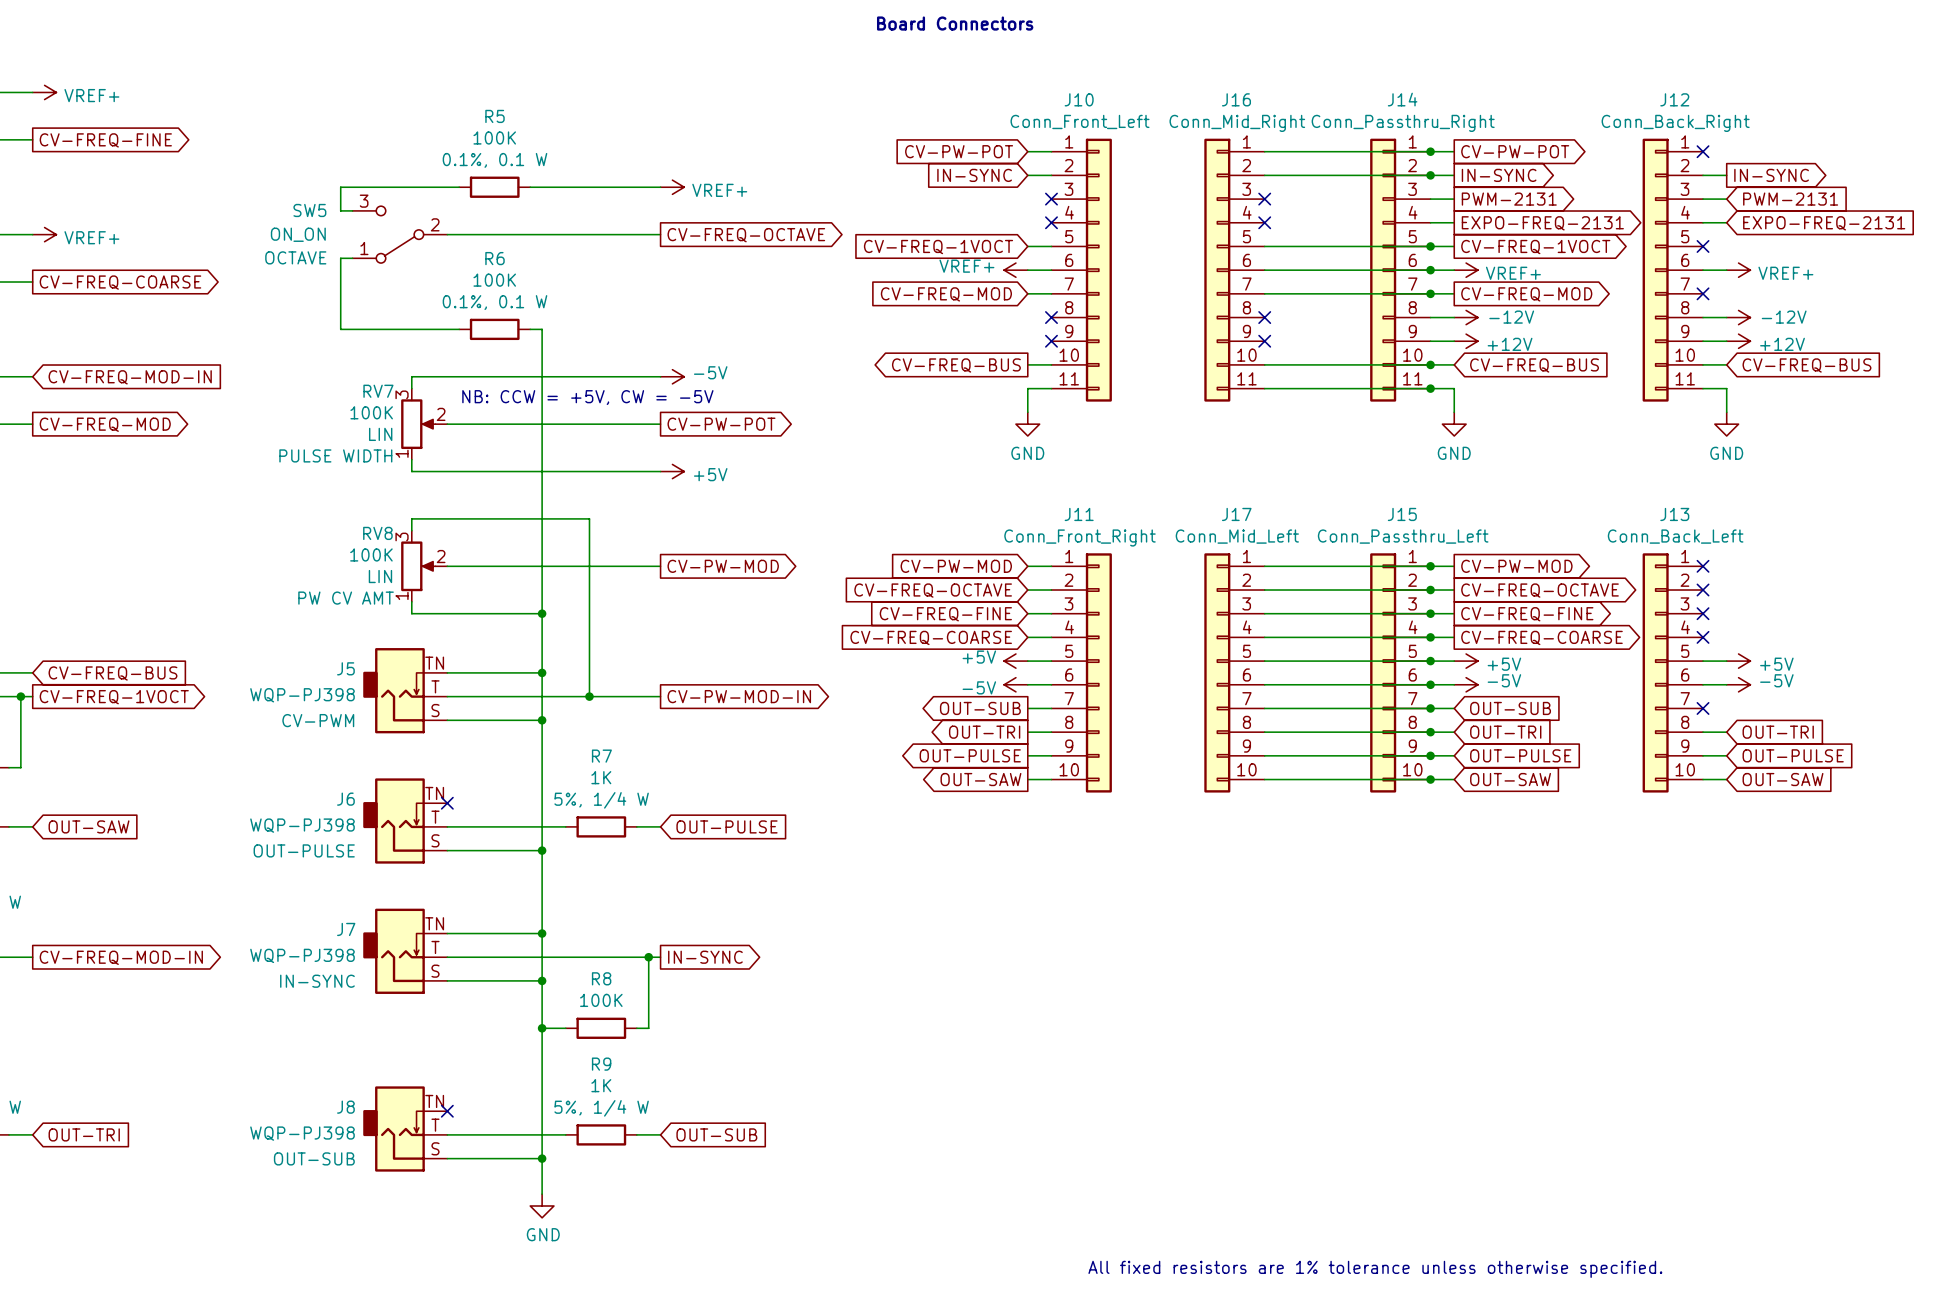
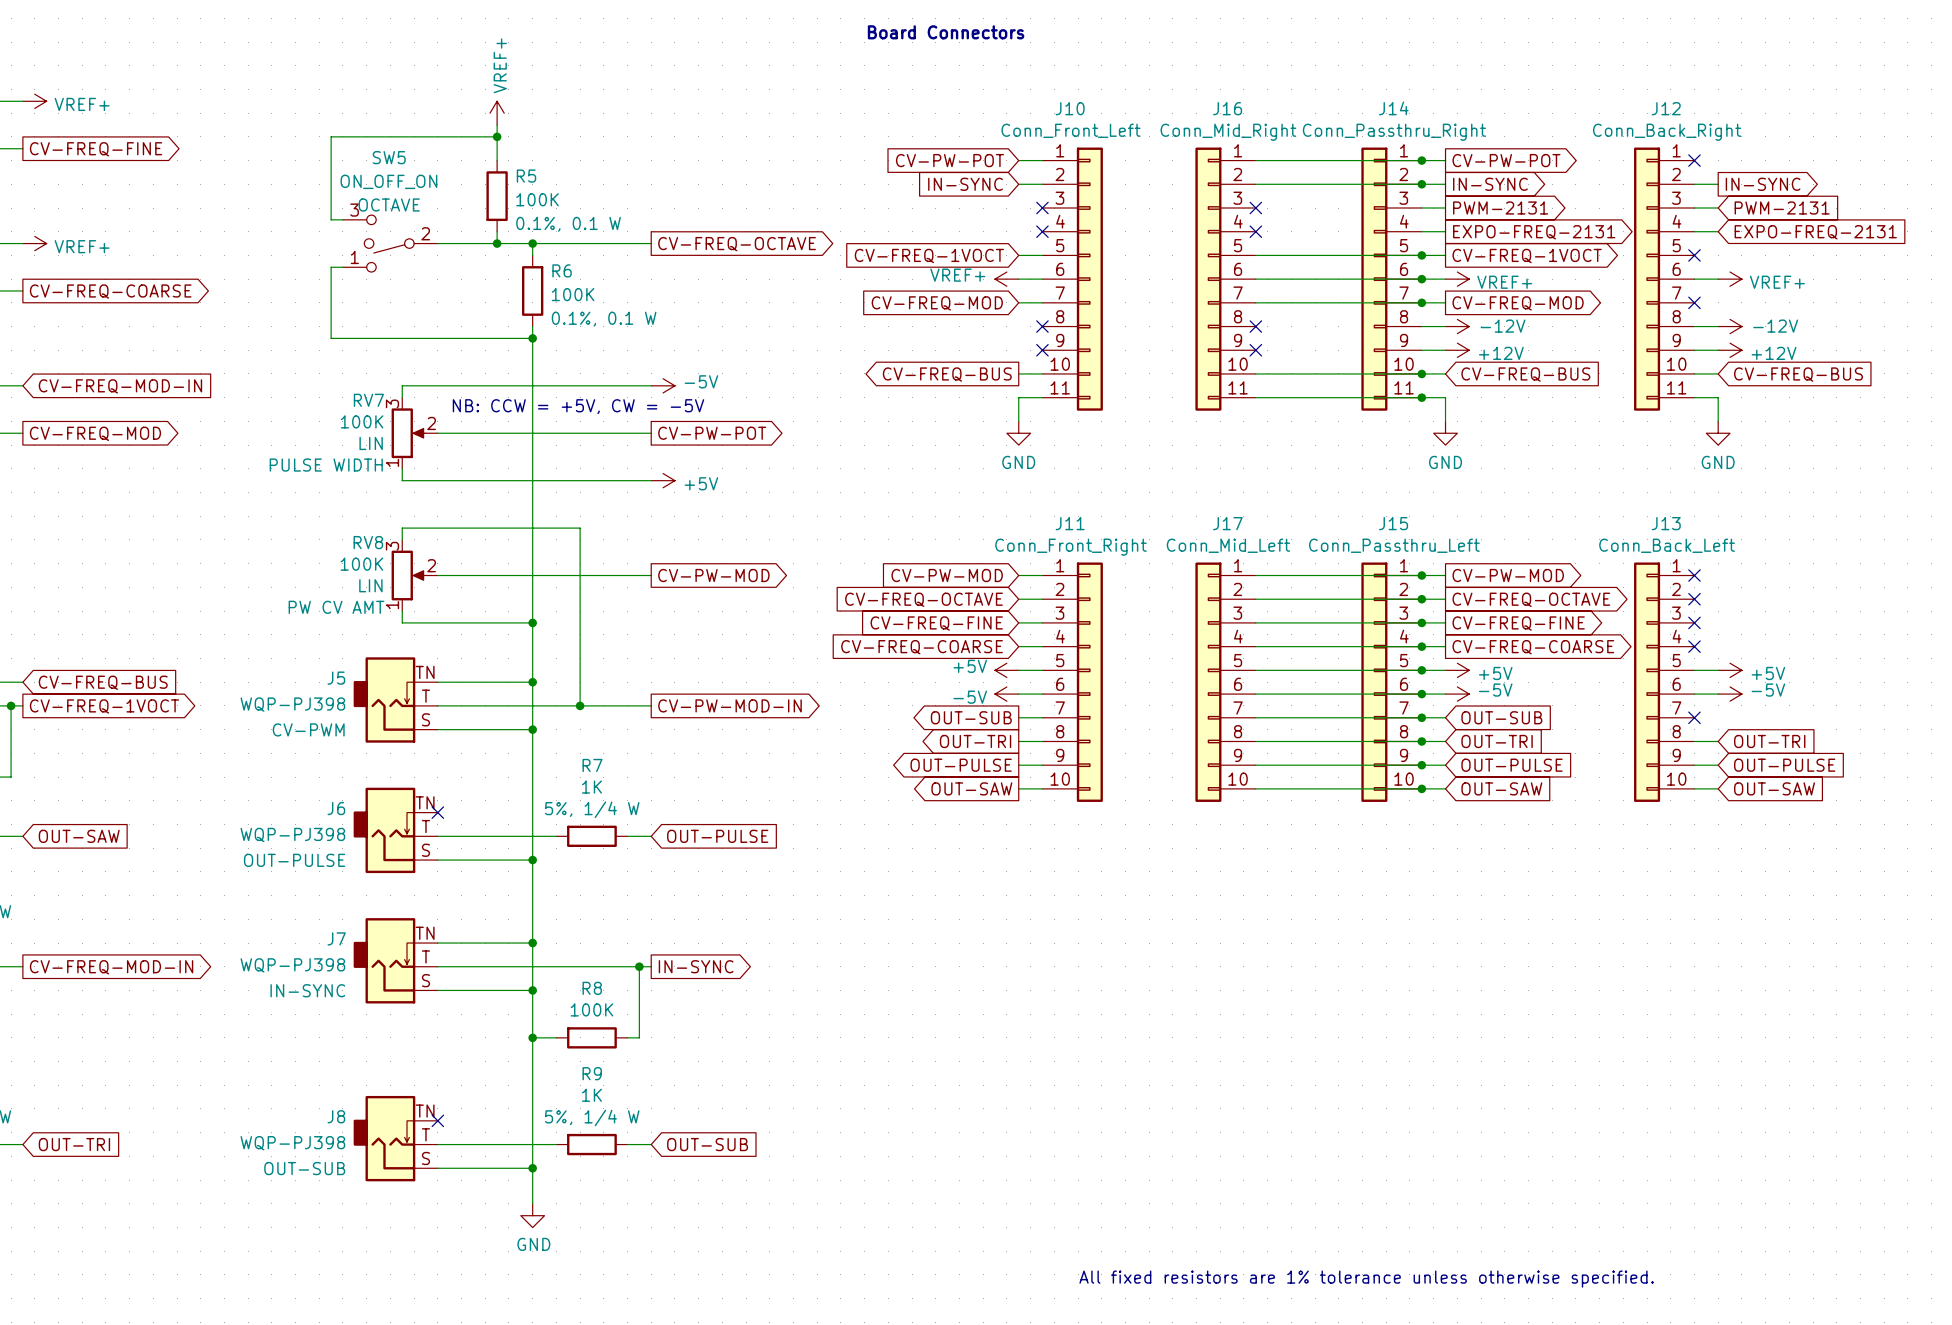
R5 name position: R5 (495, 116) -> R5 (526, 176)
wire: none -> (497, 125) (497, 160)
junction: none -> (497, 136)
R5 text position: 0.1%, 0.1 W (495, 160) -> 0.1%, 0.1 W (568, 224)
wire: (340, 187) (459, 187) -> (331, 196) (331, 136) (497, 136)
R5 rotation: 0° (494, 187) -> 90° clockwise (497, 196)
wire: (530, 187) (660, 187) -> none
power symbol rotation: 0° (672, 187) -> 90° counterclockwise (497, 113)
power symbol position: VREF+ (672, 187) -> VREF+ (497, 113)
SW5 symbol: [352, 206, 448, 264] -> [342, 215, 438, 273]
SW5 name position: SW5 (309, 210) -> SW5 (389, 157)
wire: none -> (497, 231) (497, 243)
SW5 value: ON_ON (298, 234) -> ON_OFF_ON (388, 181)
junction: none -> (497, 243)
wire: none -> (532, 243) (532, 255)
junction: none -> (532, 243)
SW5 text position: OCTAVE (295, 257) -> OCTAVE (389, 205)
R6 name position: R6 (495, 258) -> R6 (562, 270)
R6 text position: 0.1%, 0.1 W (495, 302) -> 0.1%, 0.1 W (604, 319)
wire: none -> (532, 326) (532, 338)
wire: none -> (449, 338) (520, 338)
R6 rotation: 0° (494, 329) -> 90° clockwise (532, 290)
R6 position: (494, 329) -> (532, 290)
junction: none -> (532, 338)

